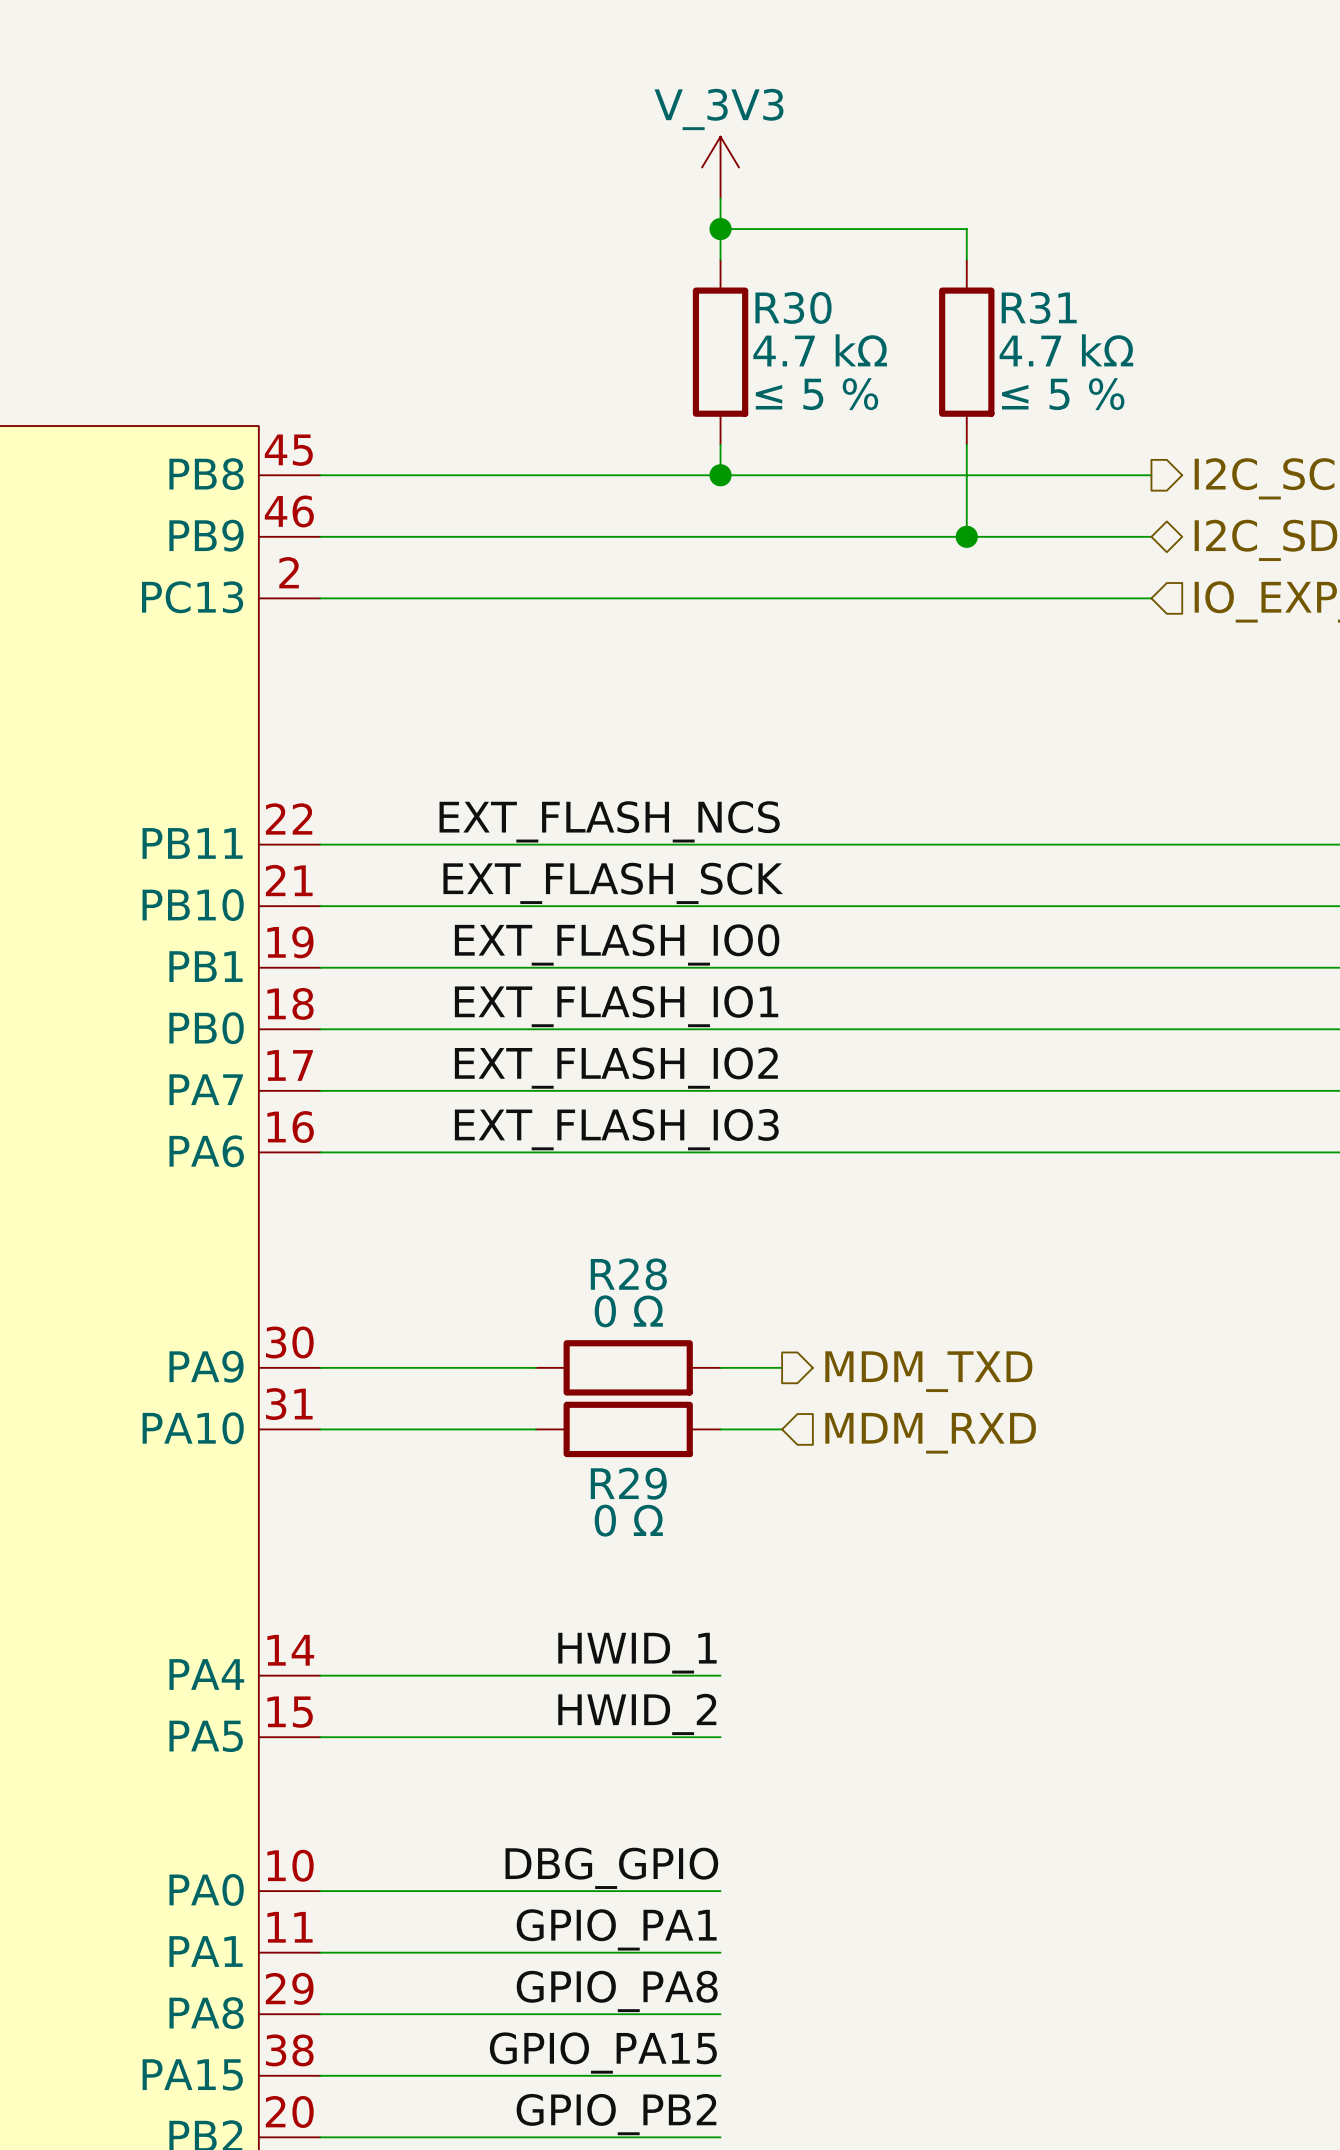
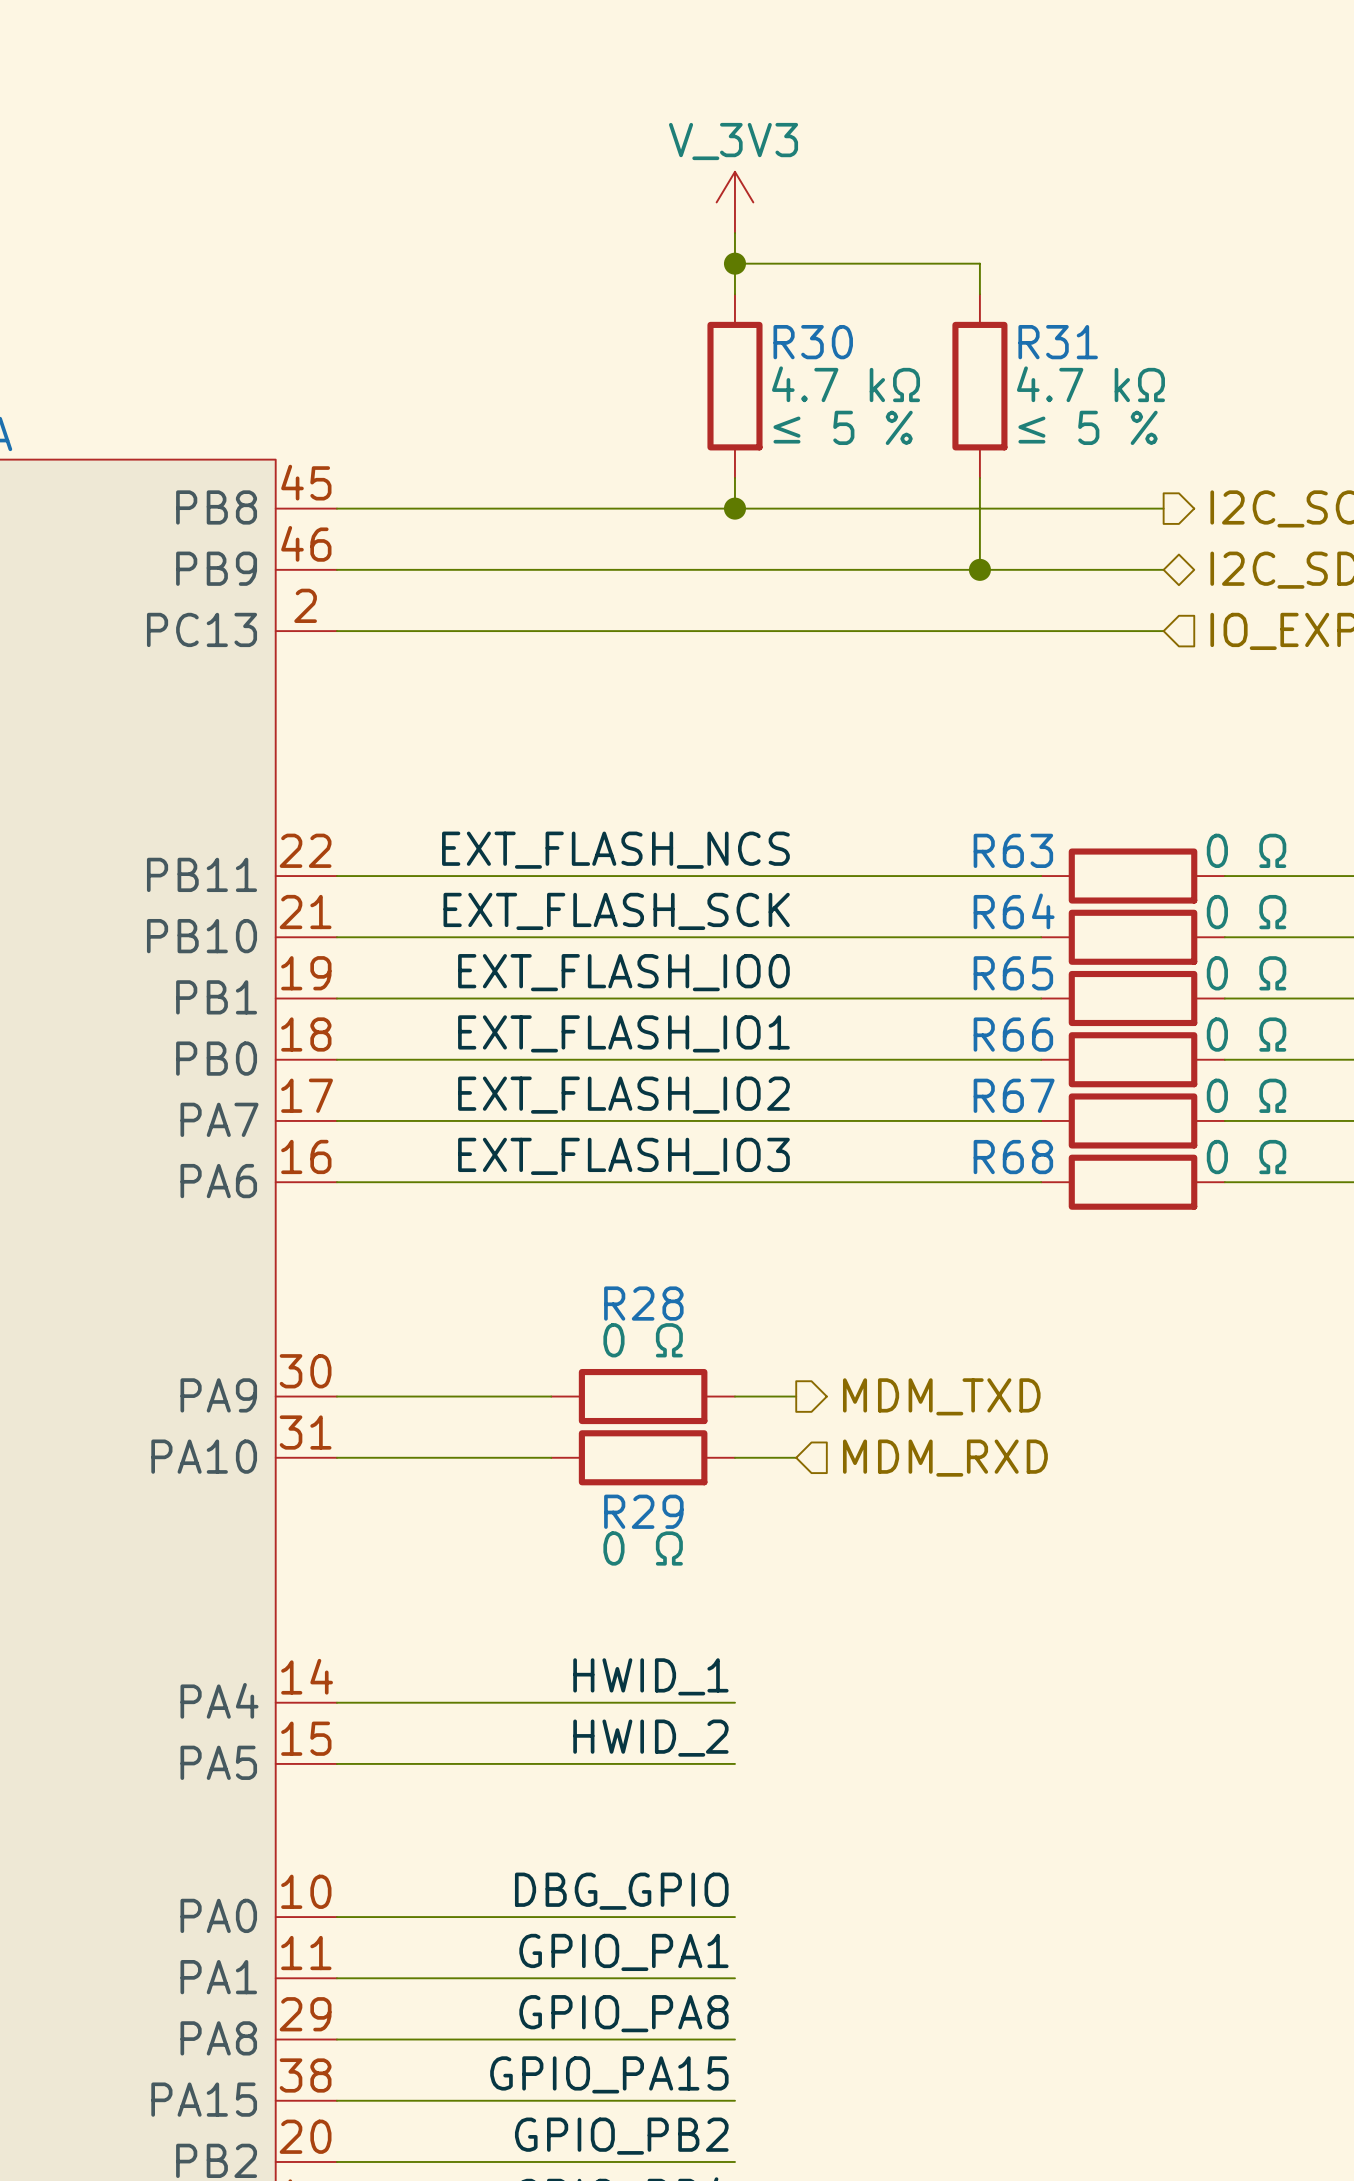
wire: (1028, 844) (1213, 844) -> none
R63: none -> 0 Ω (1133, 876)
wire: (1028, 906) (1213, 906) -> none
R64: none -> 0 Ω (1133, 937)
wire: (1028, 967) (1213, 967) -> none
R65: none -> 0 Ω (1133, 998)
wire: (1028, 1029) (1213, 1029) -> none
R66: none -> 0 Ω (1133, 1059)
wire: (1028, 1090) (1213, 1090) -> none
R67: none -> 0 Ω (1133, 1120)
wire: (1028, 1152) (1213, 1152) -> none
R68: none -> 0 Ω (1133, 1182)

